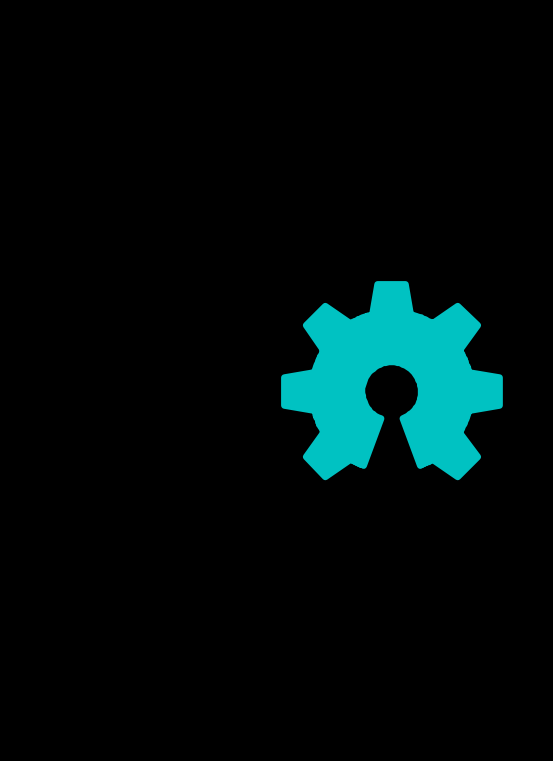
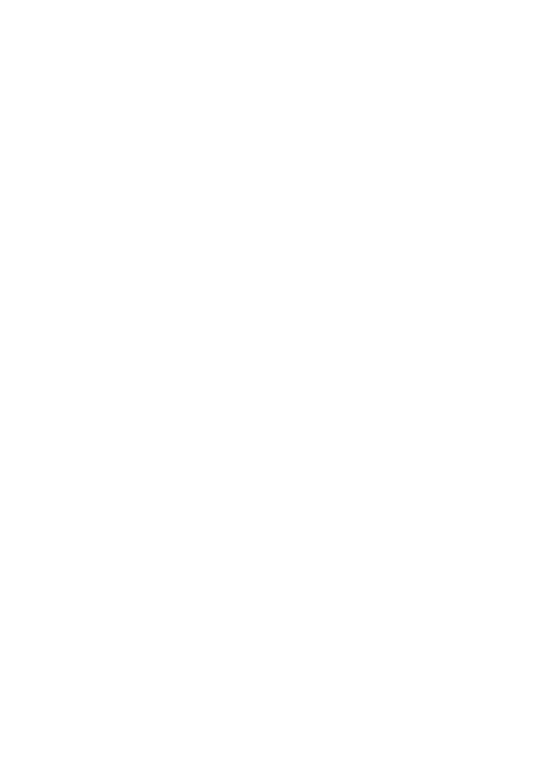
drawing: [281, 281, 503, 481] -> none

